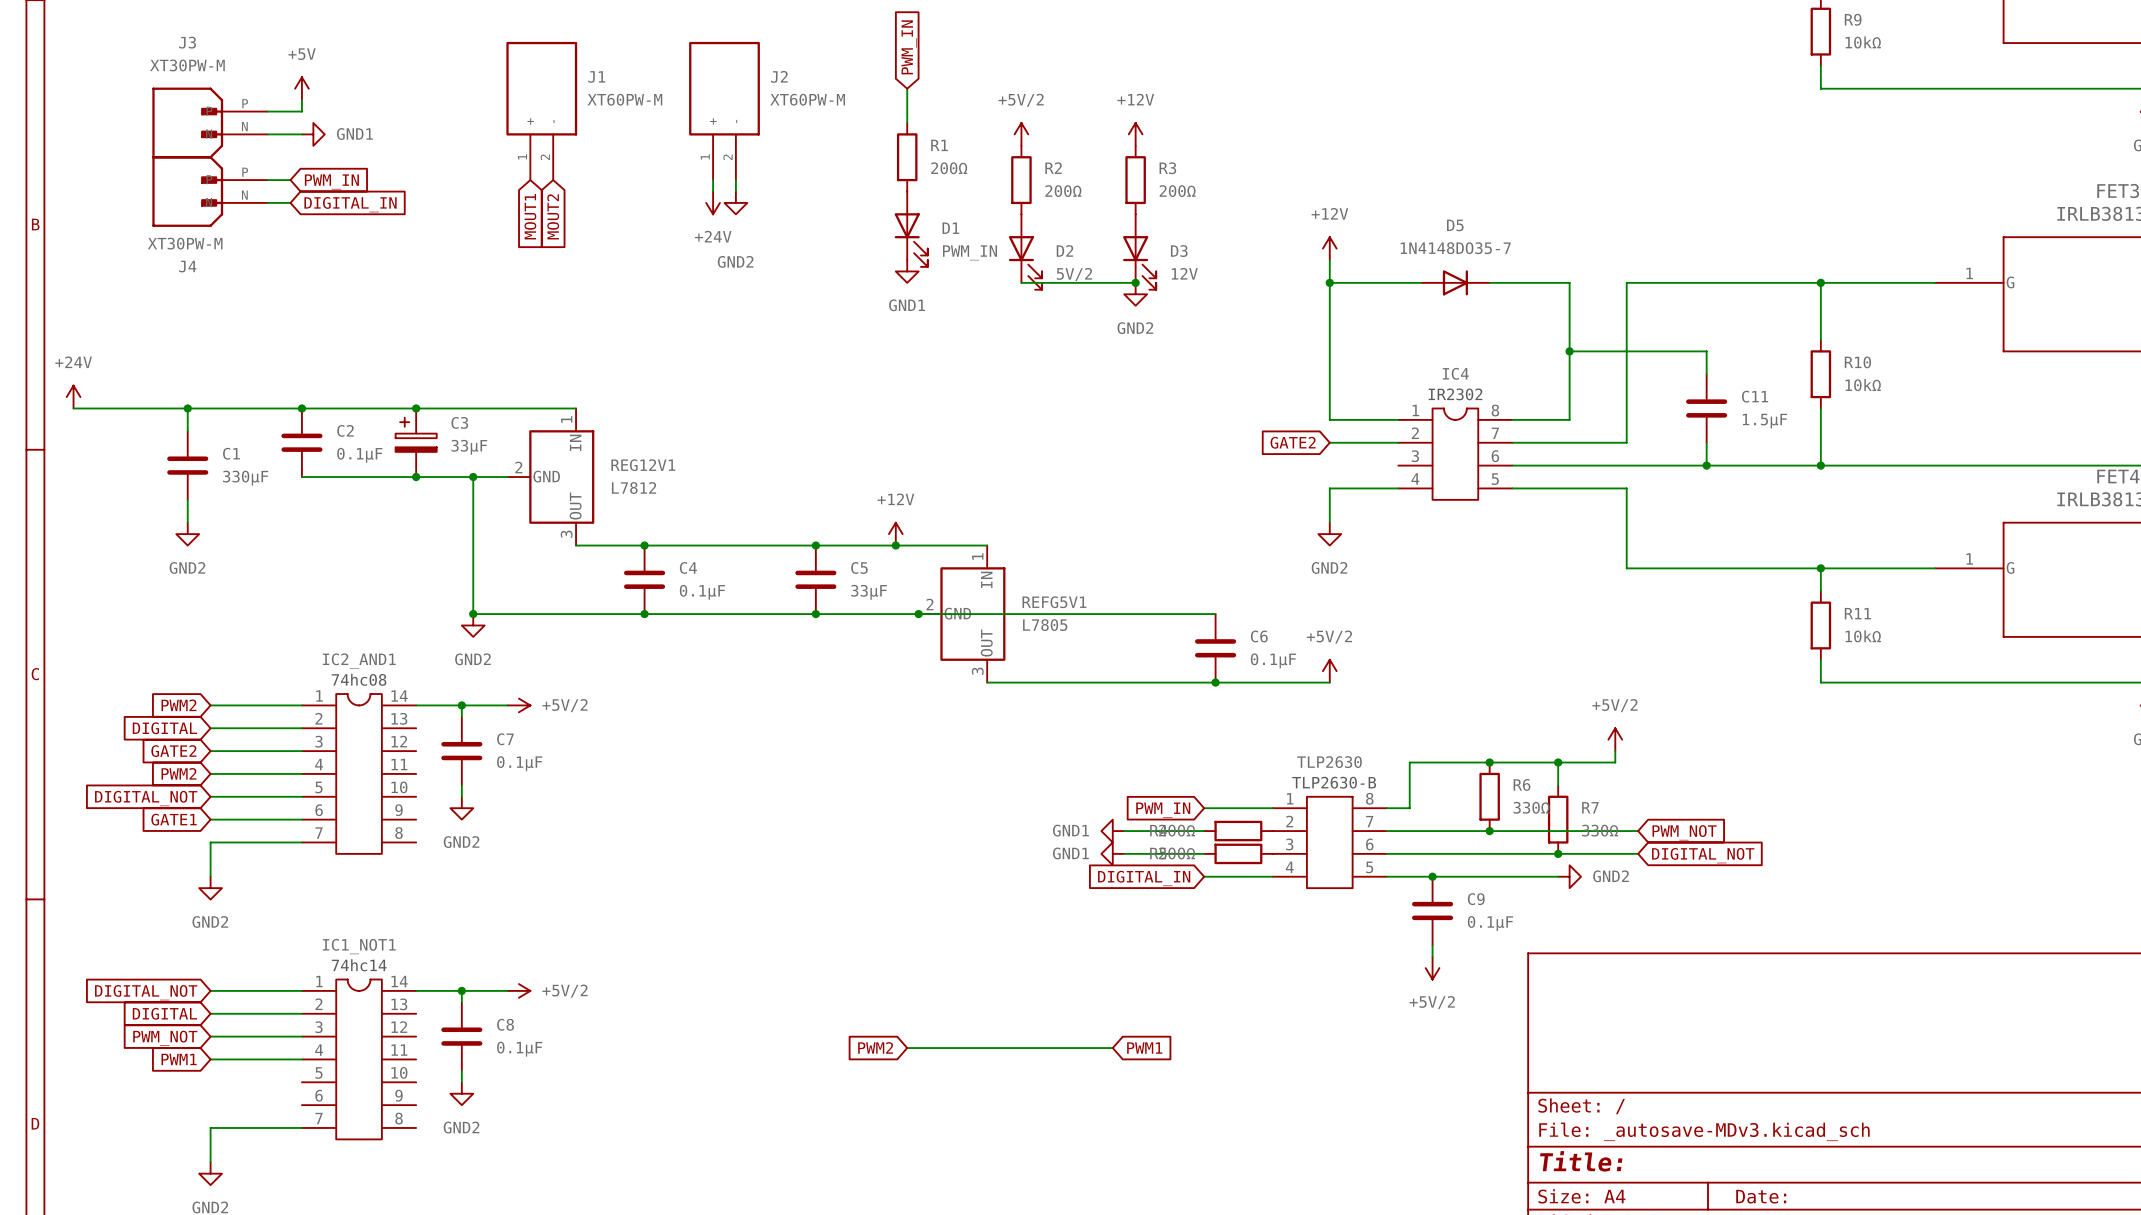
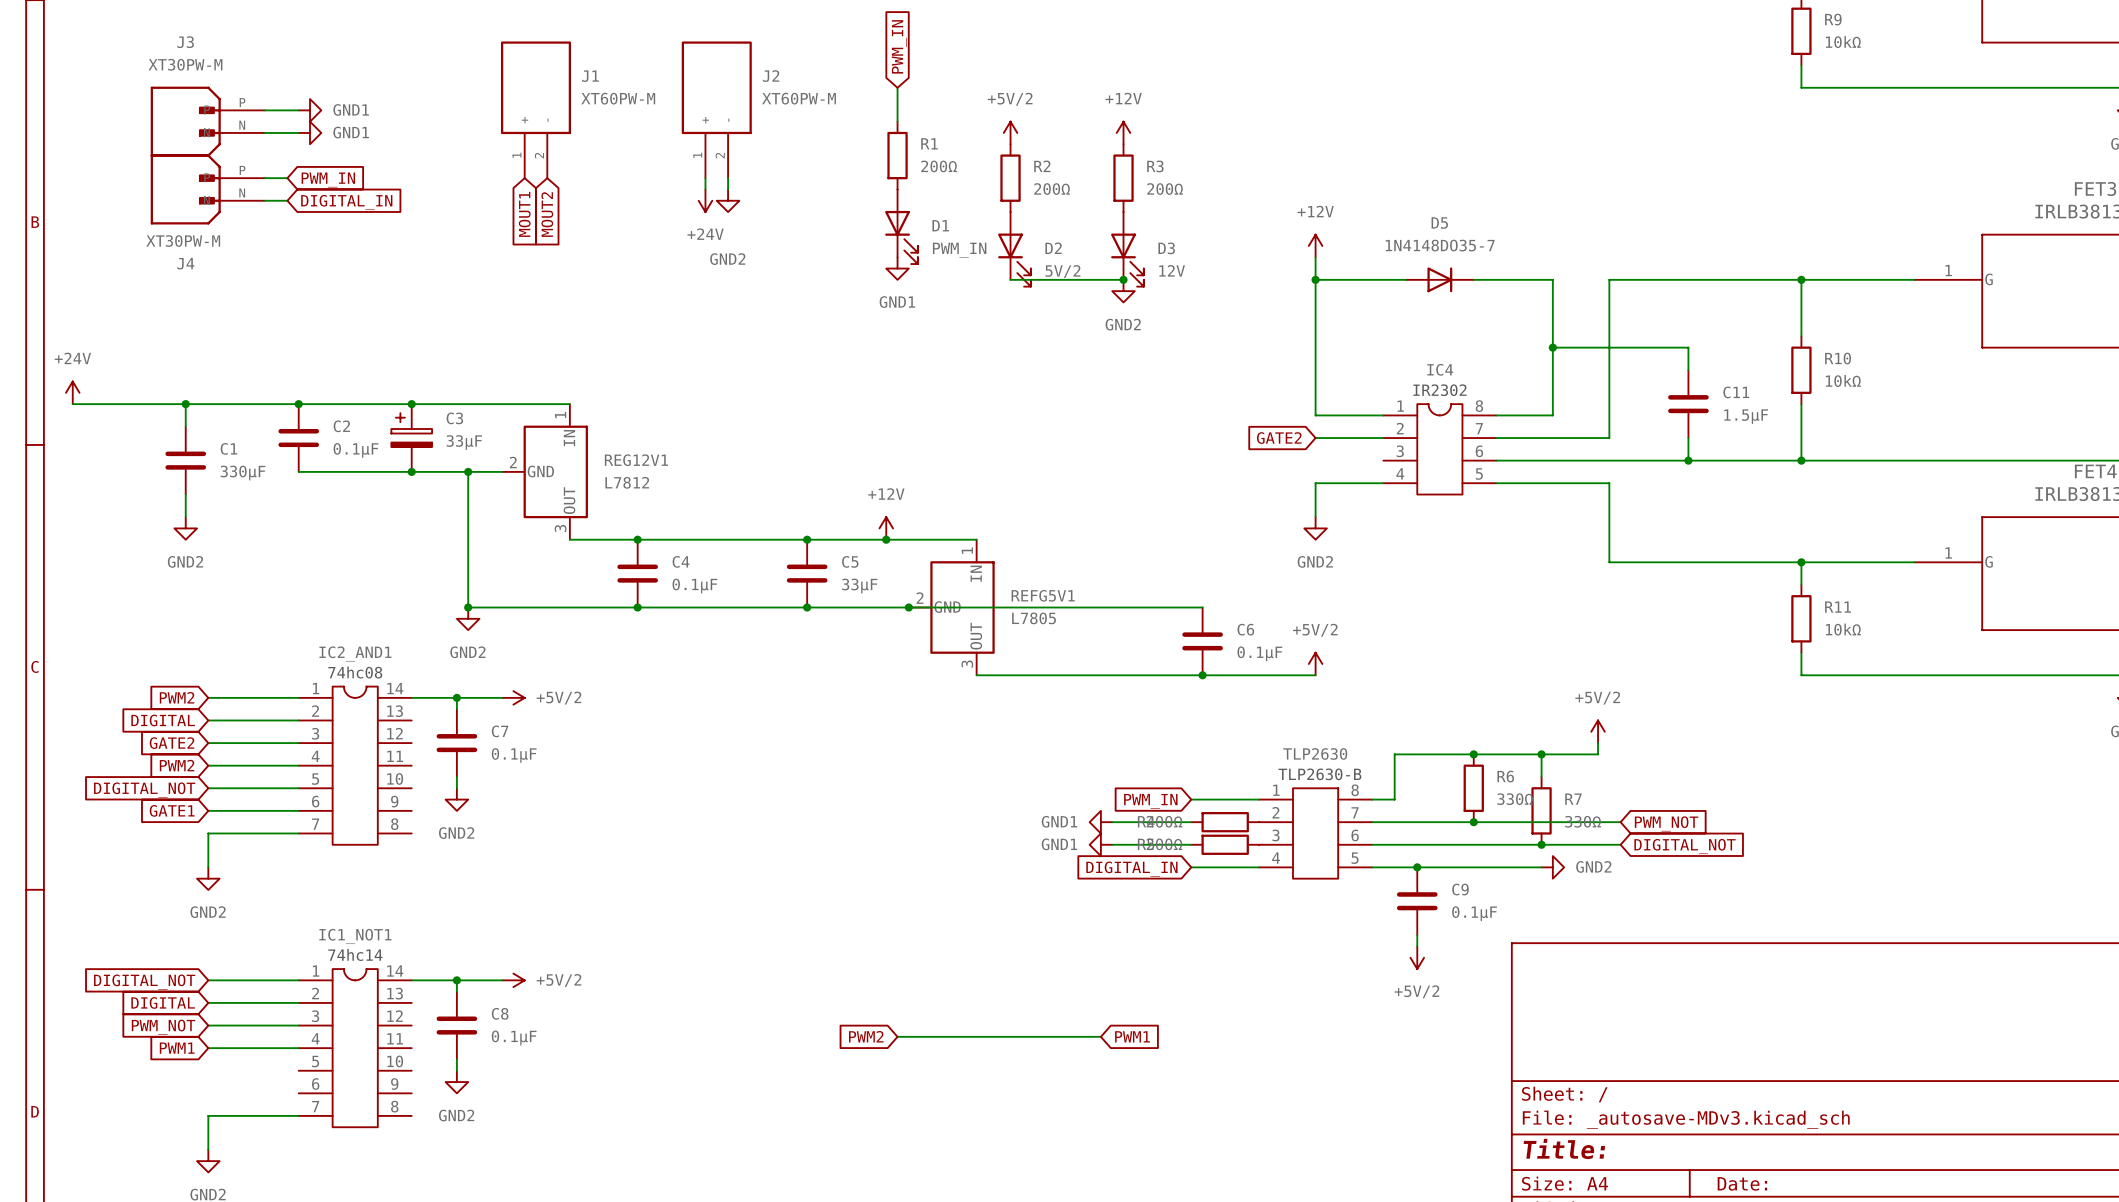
power symbol: +5V (301, 88) -> none
wire: (301, 100) (301, 111) -> none
power symbol: none -> GND1 (310, 110)

